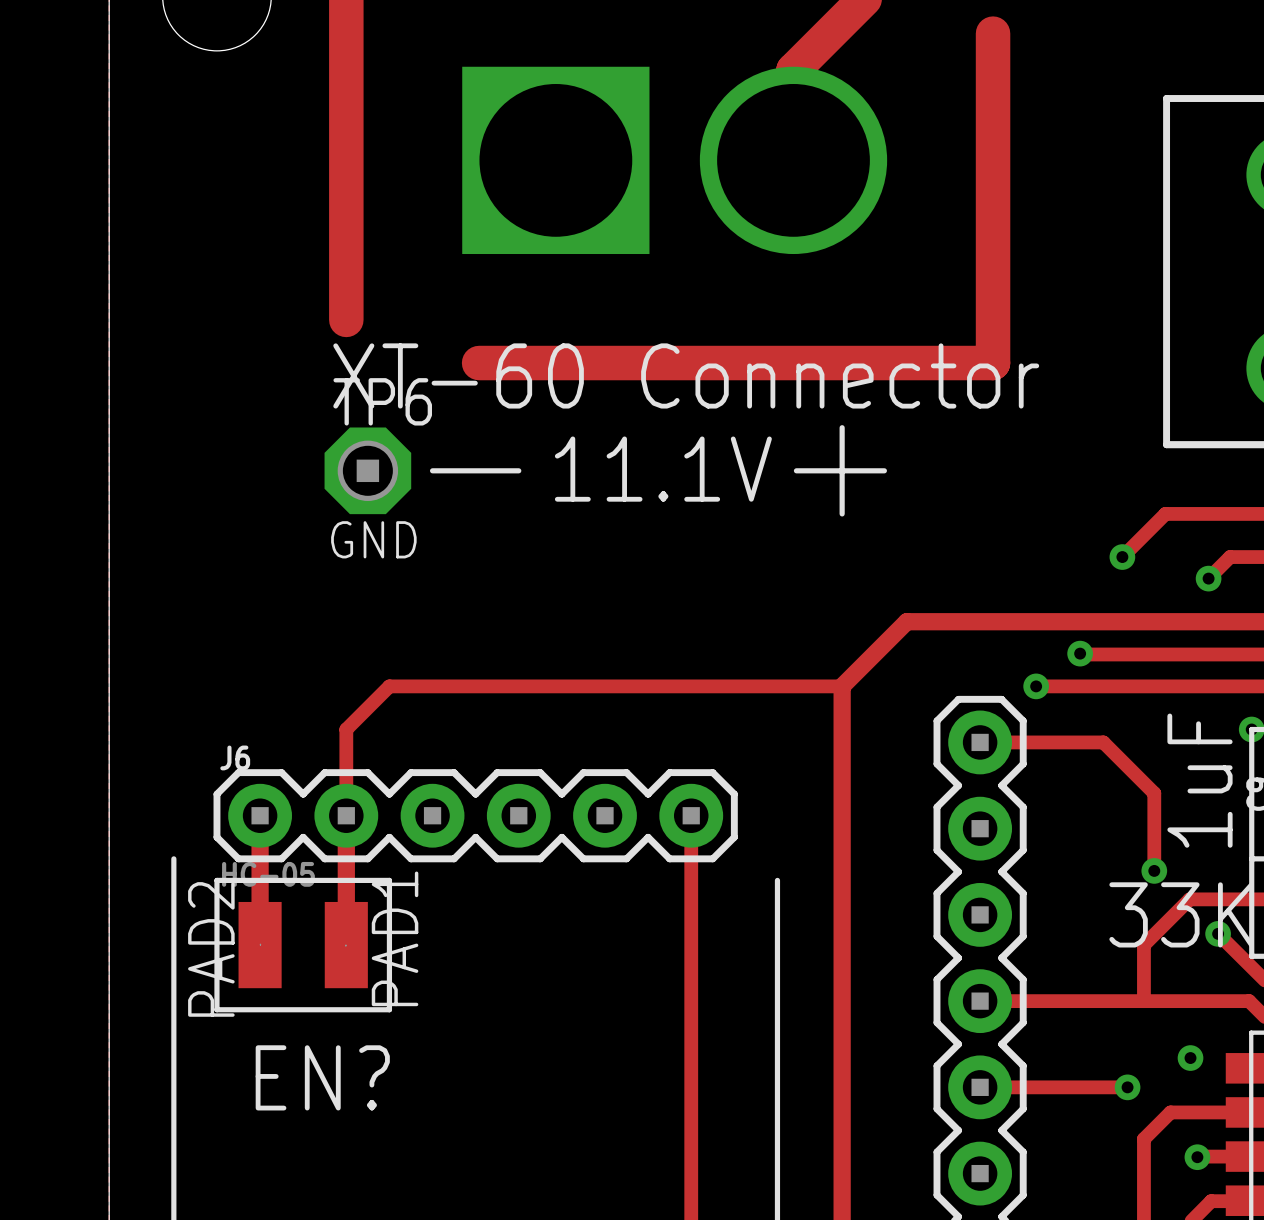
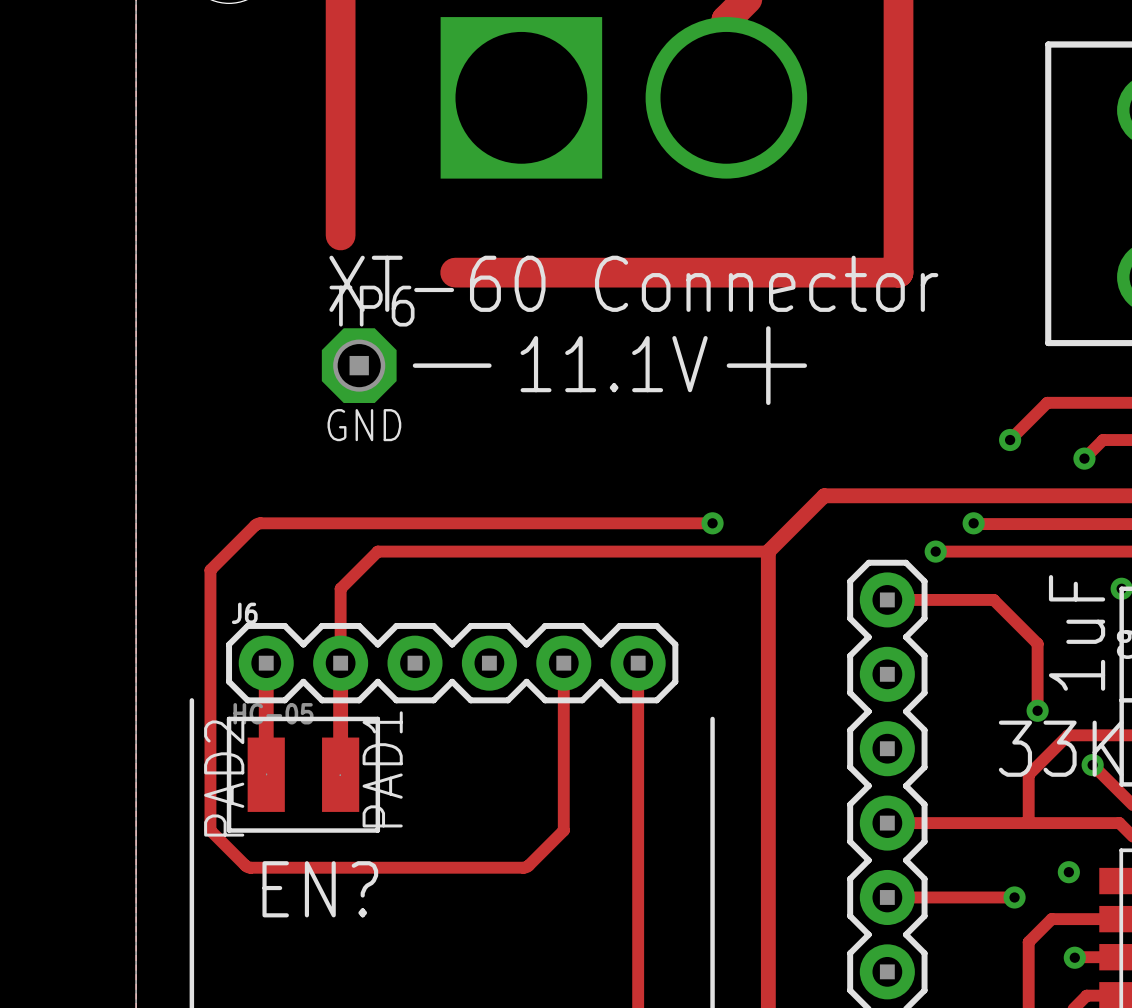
track: none -> (712, 523) (256, 524) (210, 570) (210, 830) (249, 867) (526, 867) (563, 830) (563, 663)
via: none -> (712, 523)

